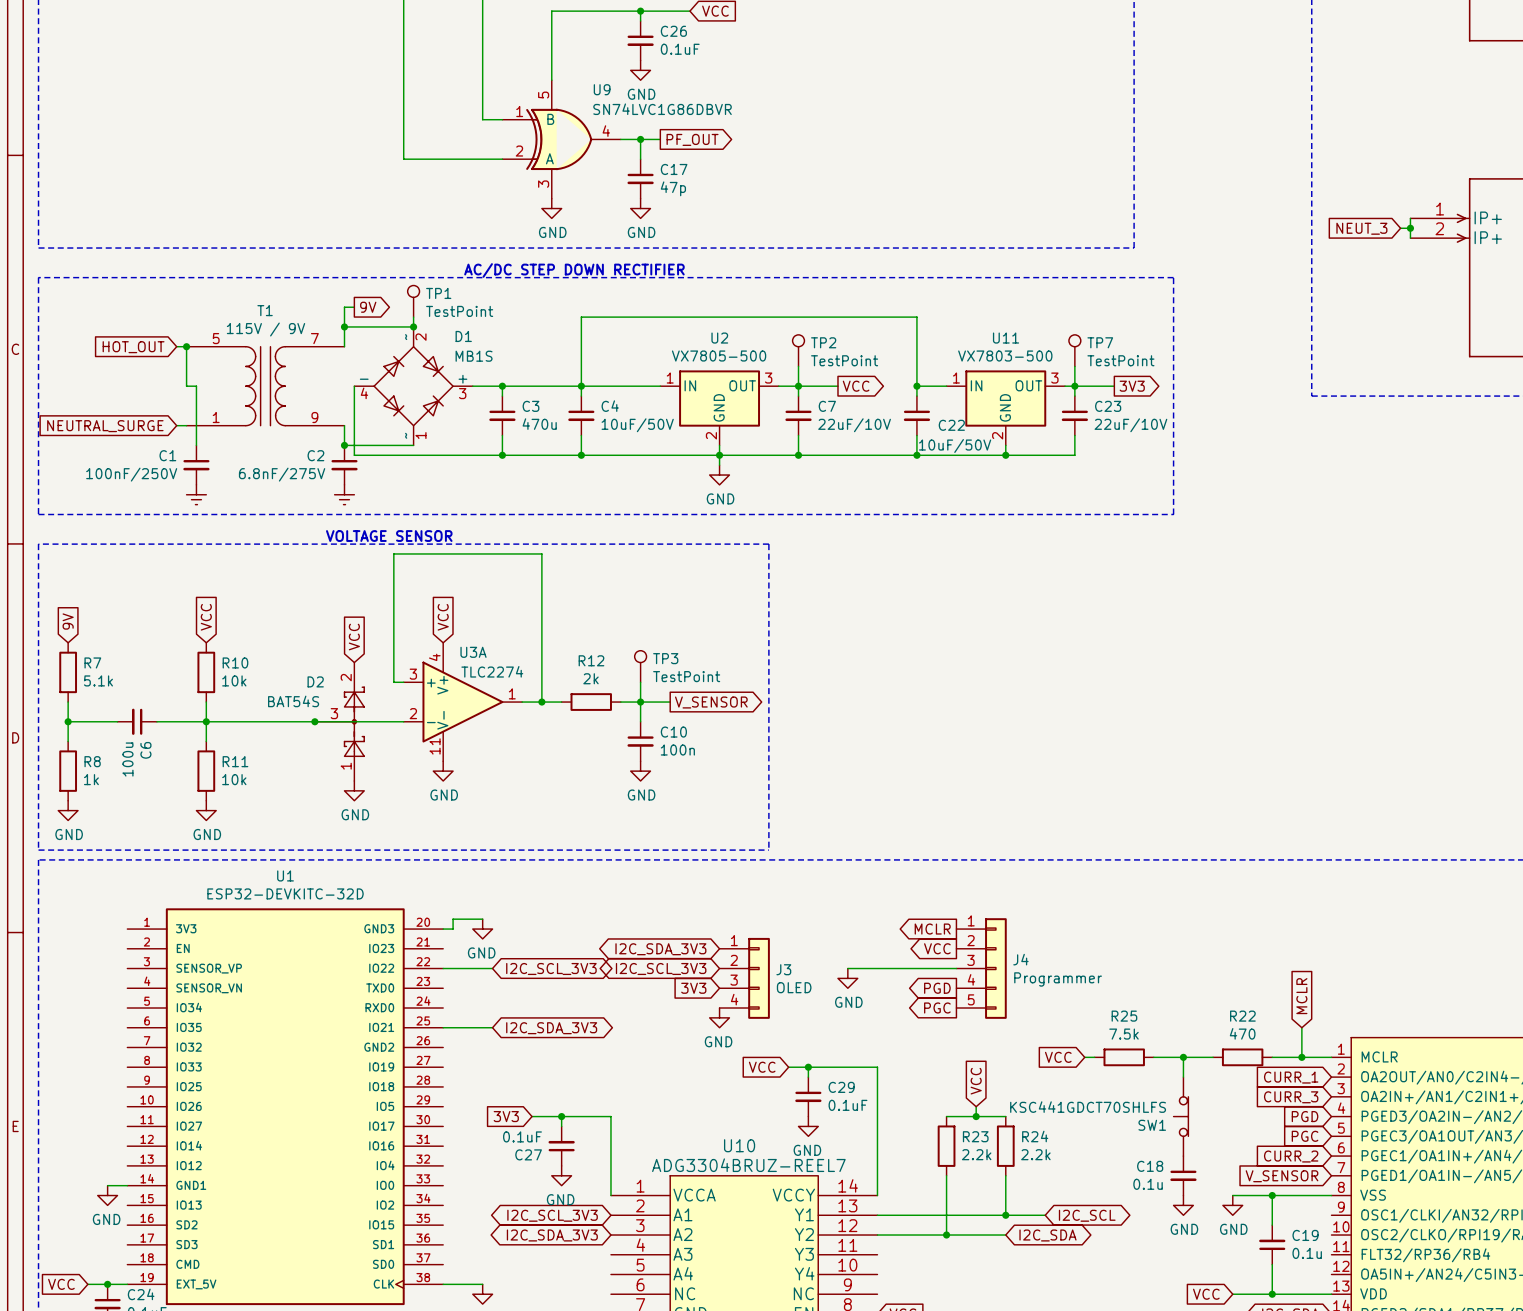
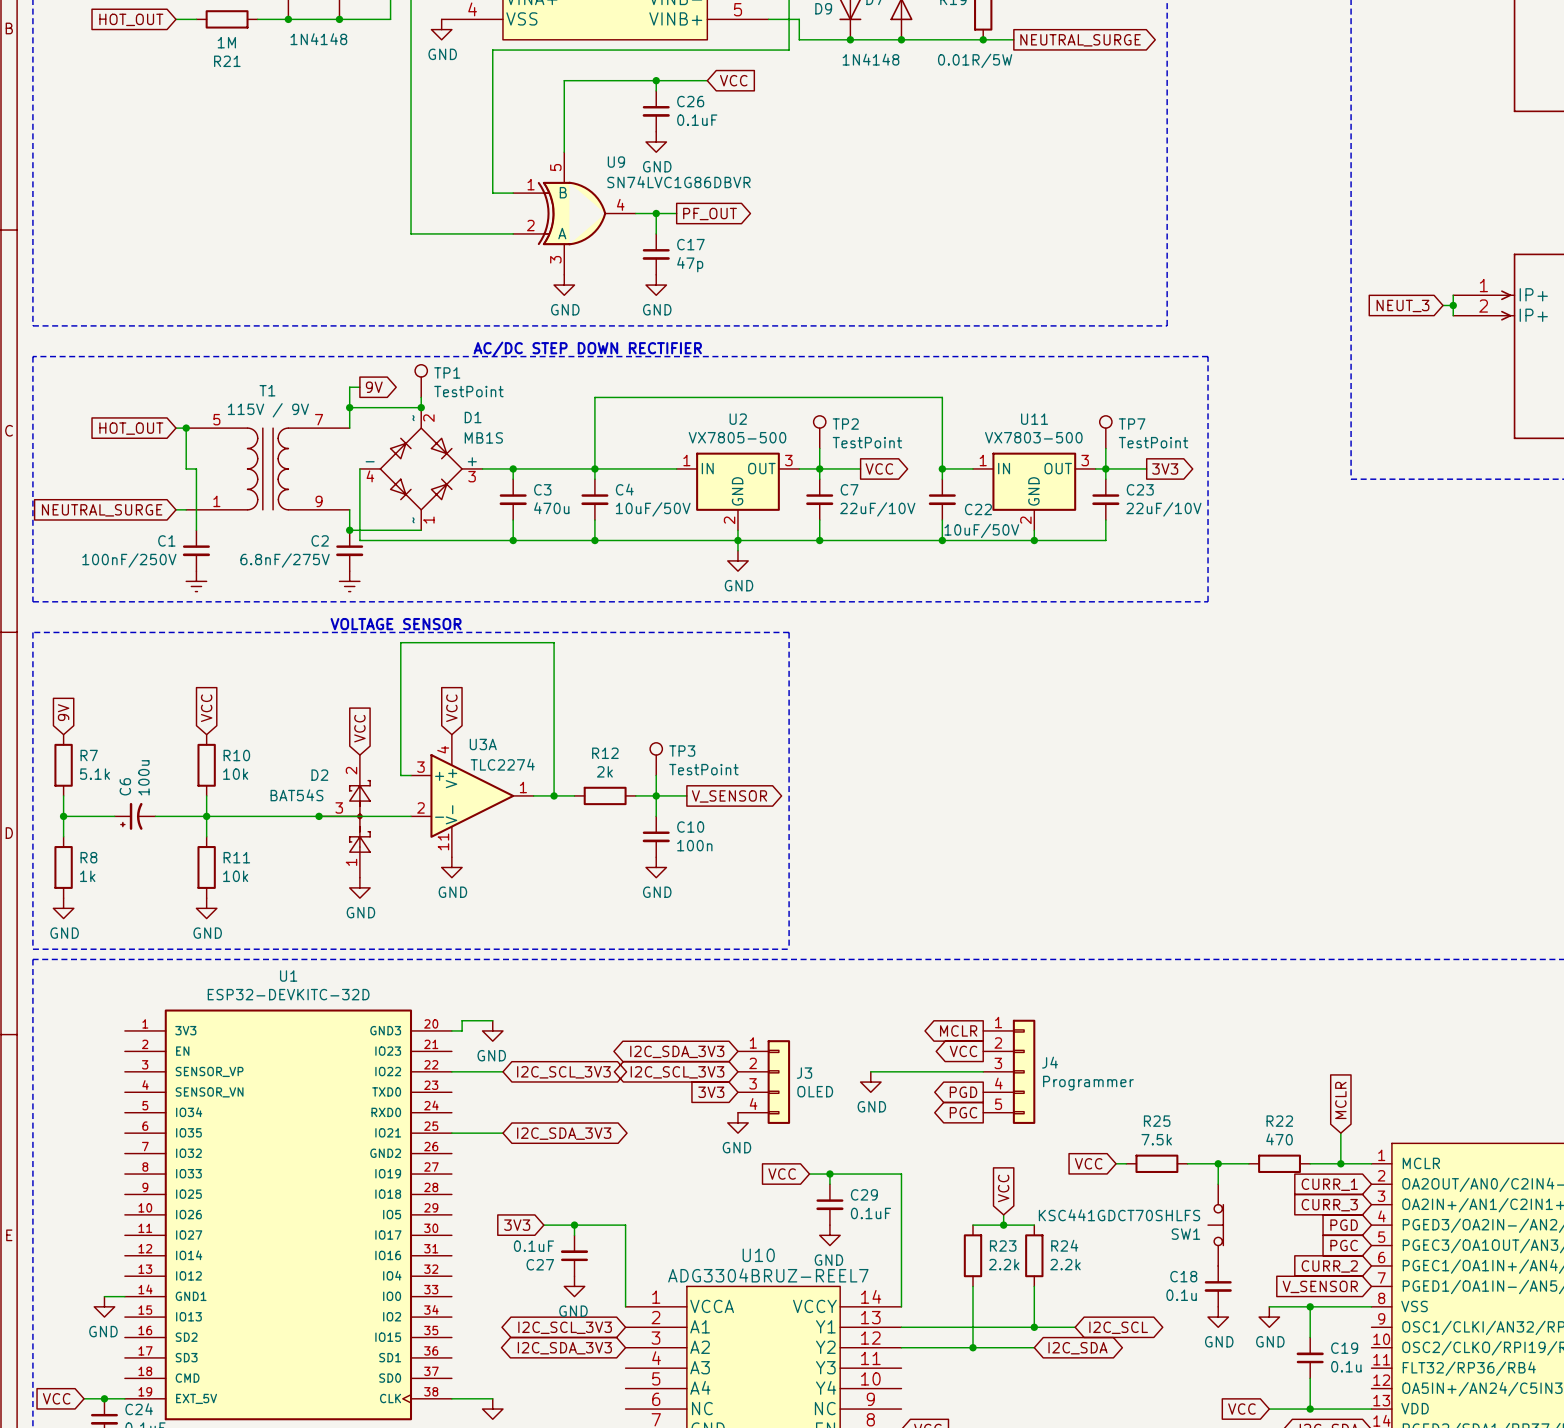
C6 symbol: [117, 708, 157, 735] -> [114, 802, 156, 830]
C6 name position: C6 (145, 750) -> C6 (125, 786)
C6 value position: 100u (127, 759) -> 100u (143, 777)

